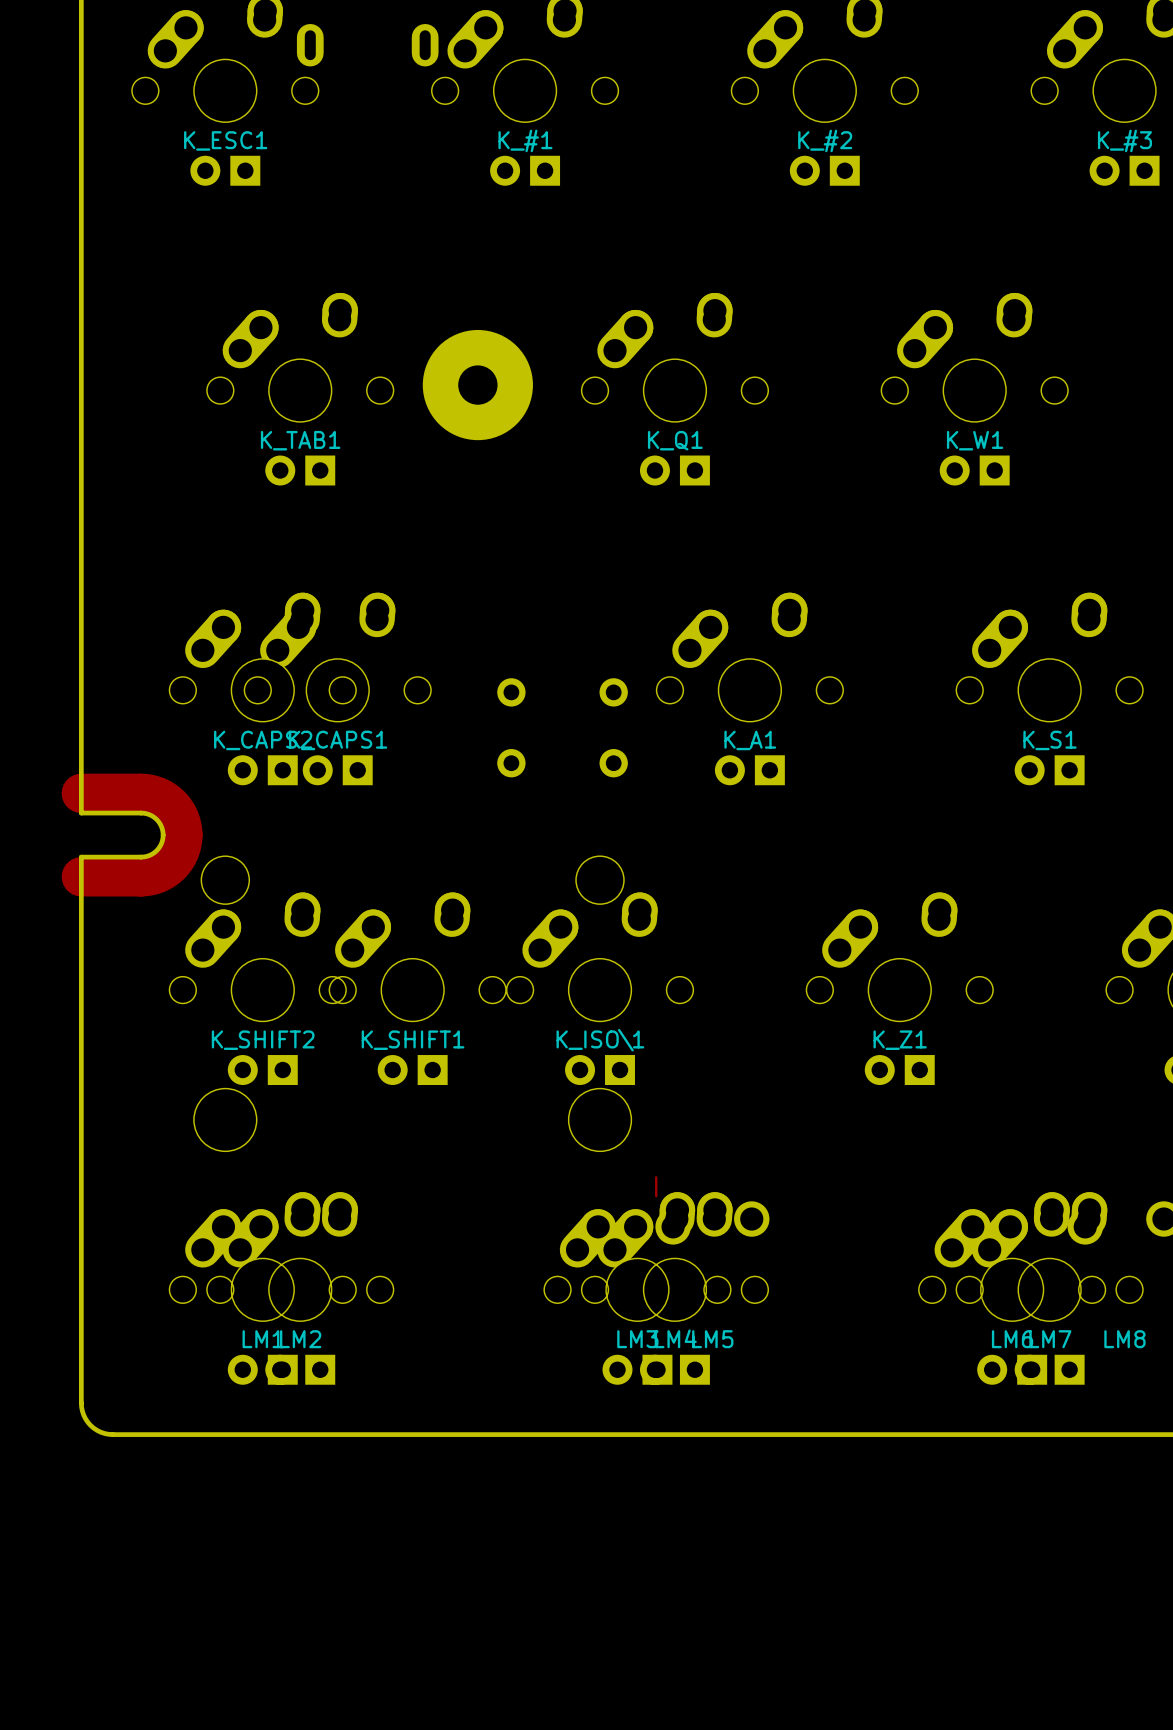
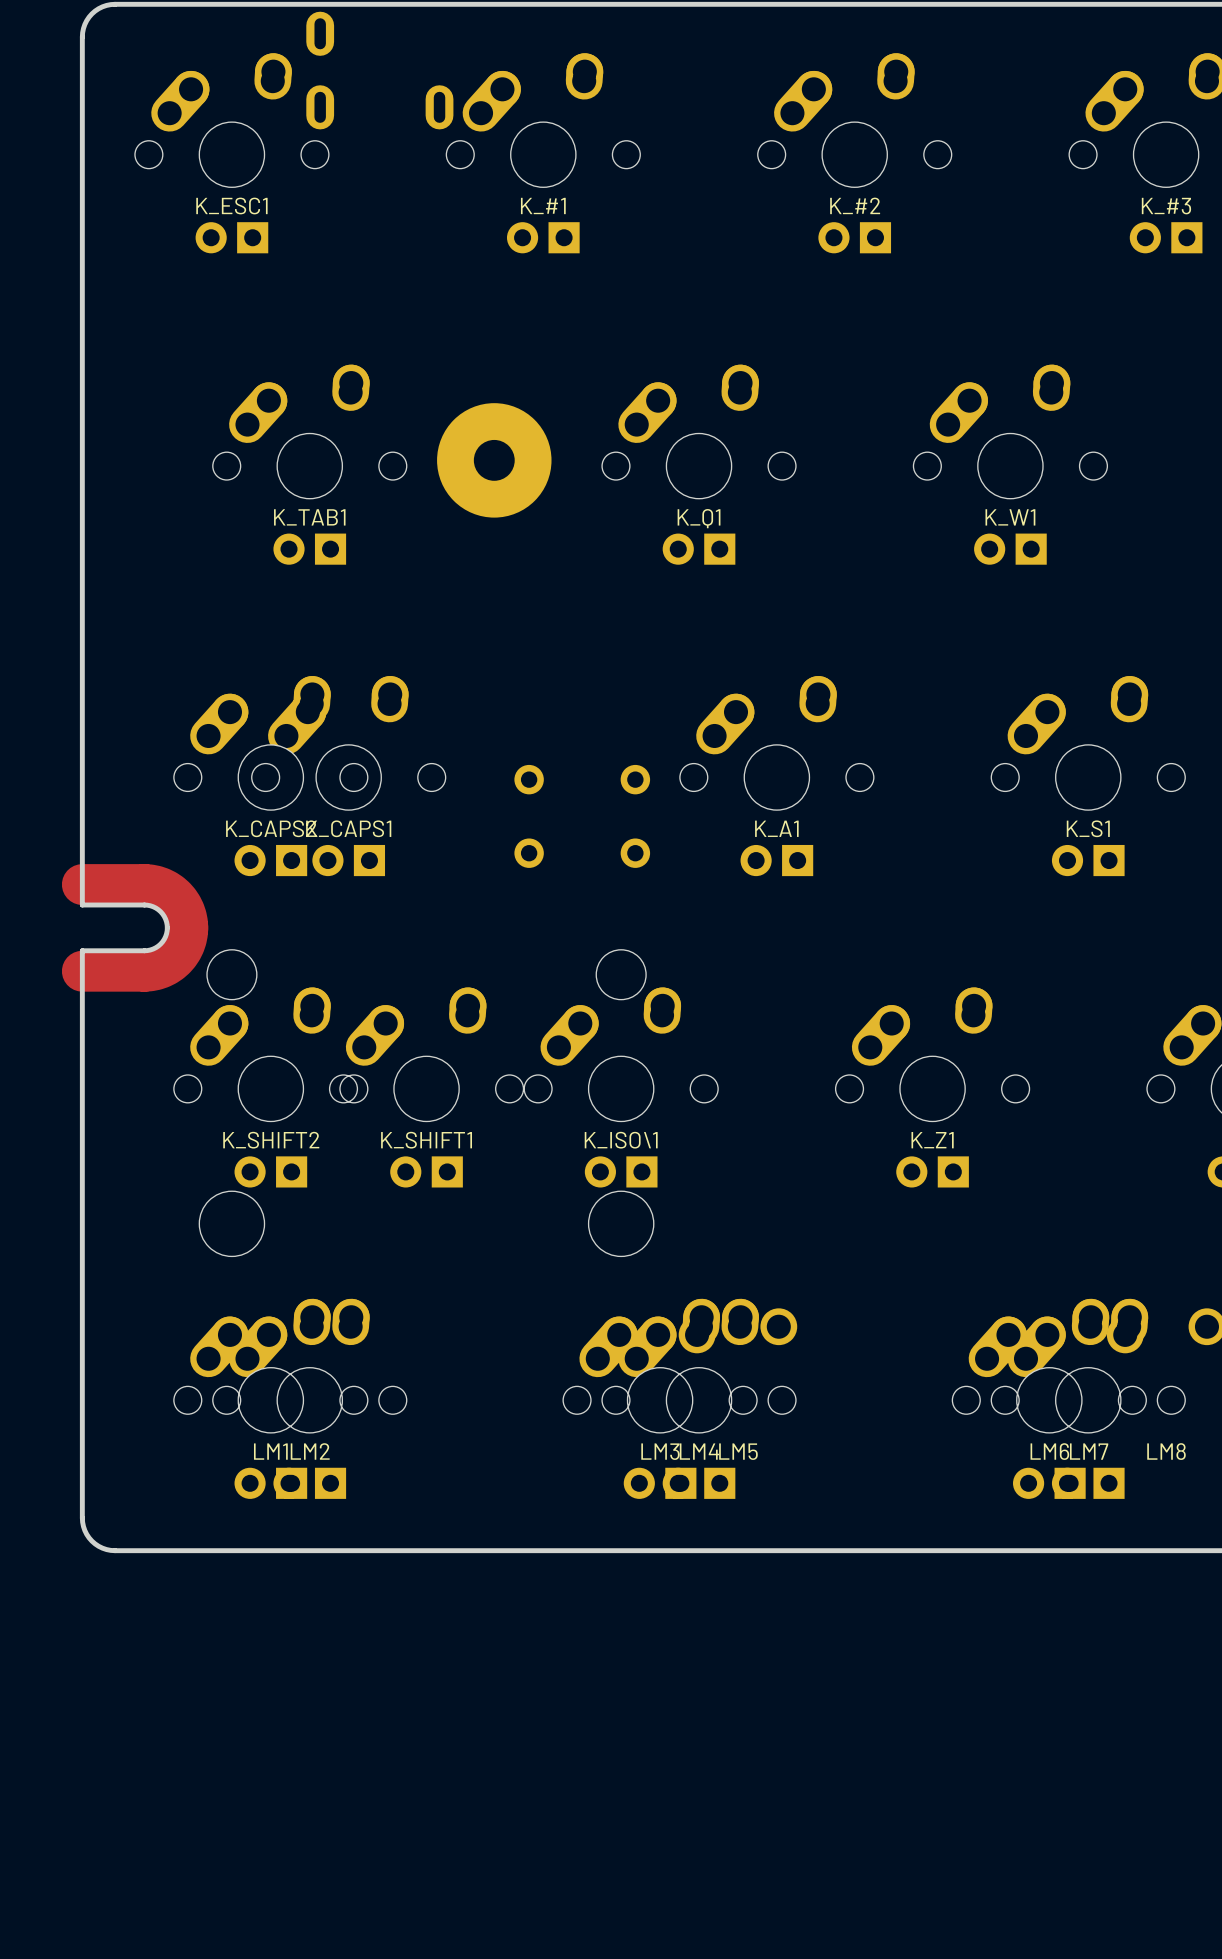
track: (656, 1177) (656, 1196) -> none

